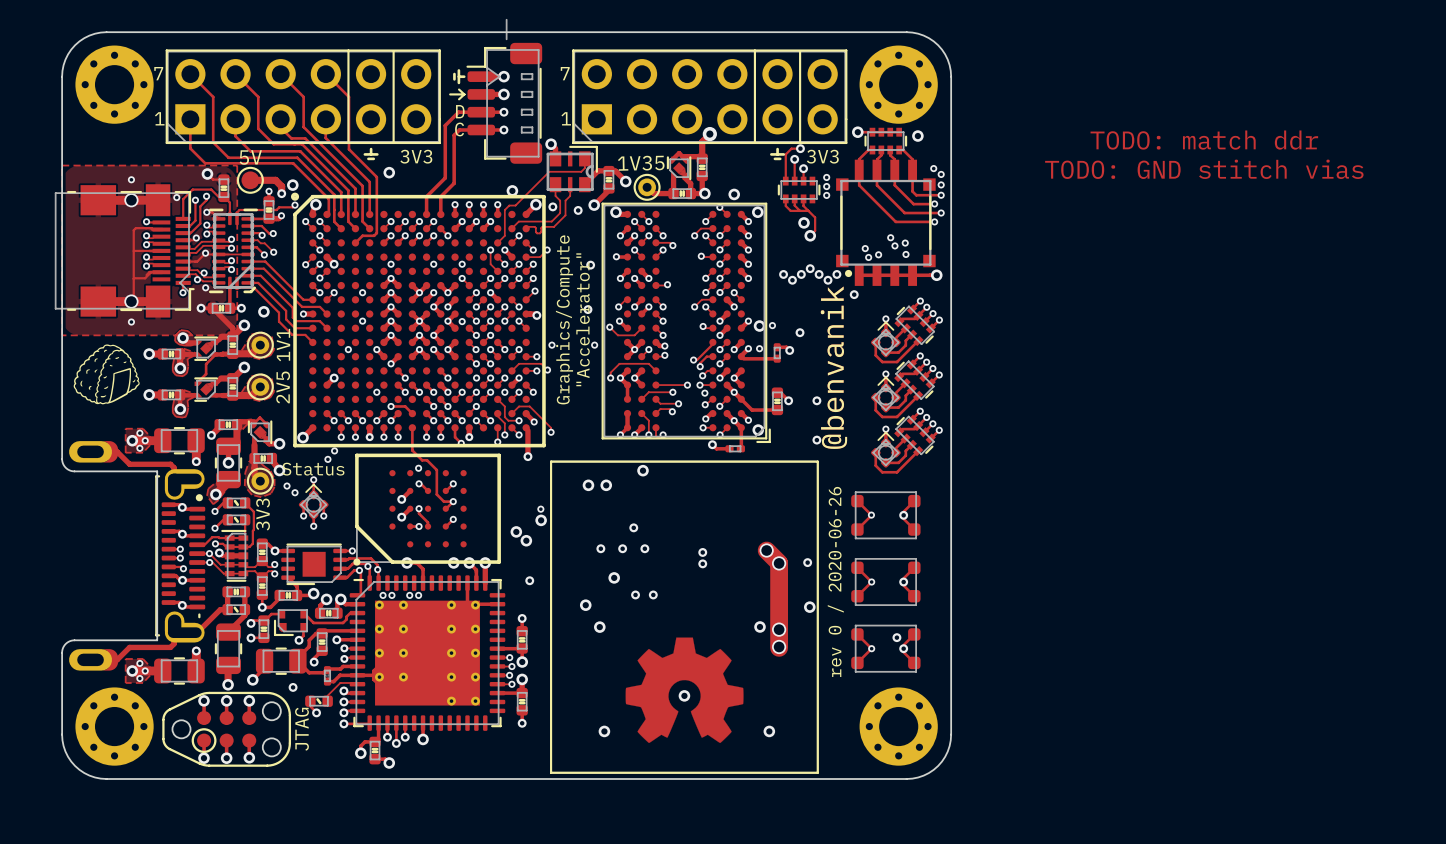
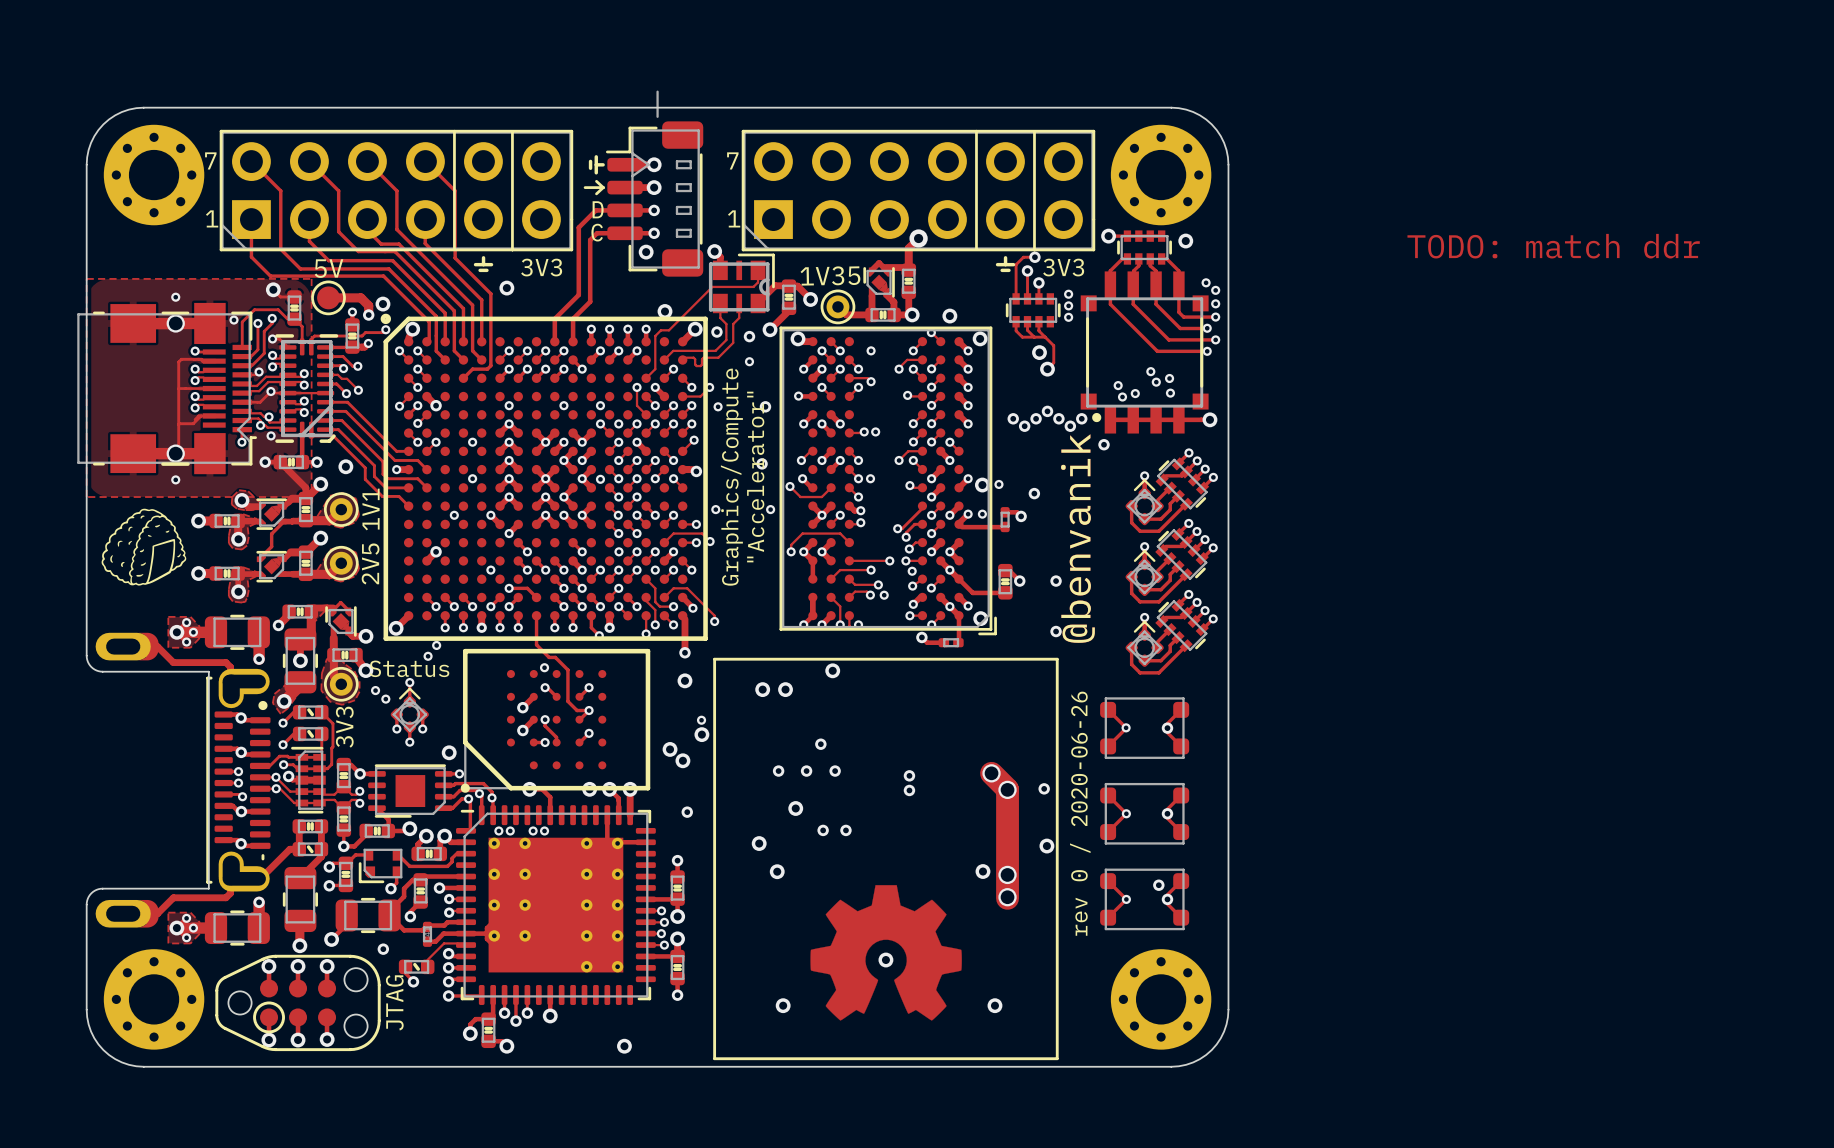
via: none -> (646, 252)
text: TODO: GND stitch vias (1204, 169) -> none
via: none -> (871, 350)
via: none -> (749, 361)
via: none -> (718, 406)
via: none -> (618, 423)
via: none -> (875, 431)
via: none -> (870, 478)
via: none -> (884, 595)
via: none -> (684, 680)
via: none -> (449, 752)
via: none -> (624, 1046)

